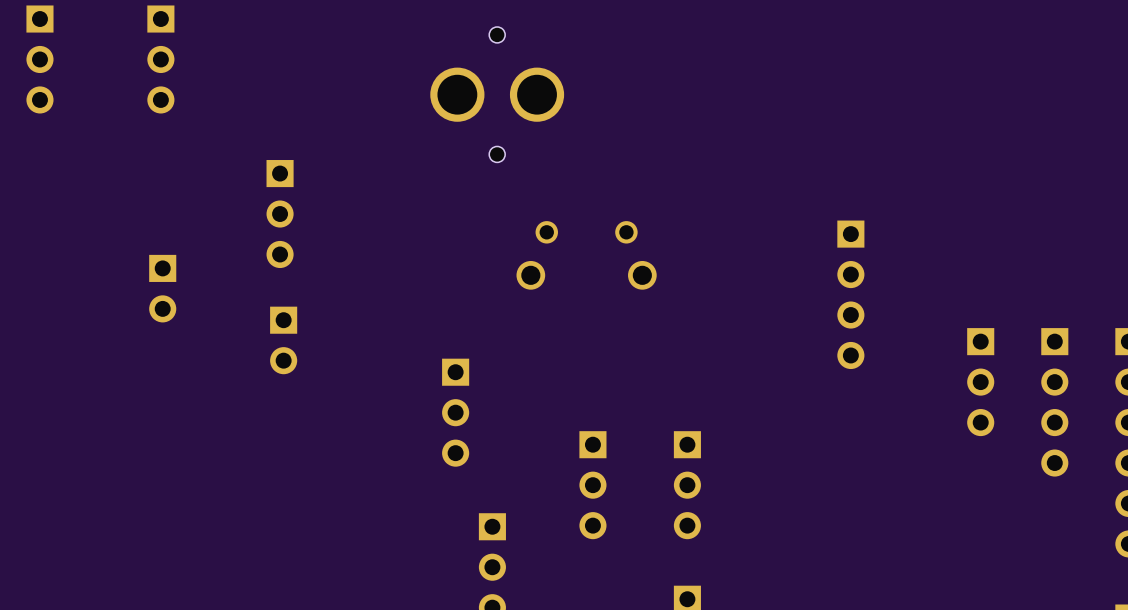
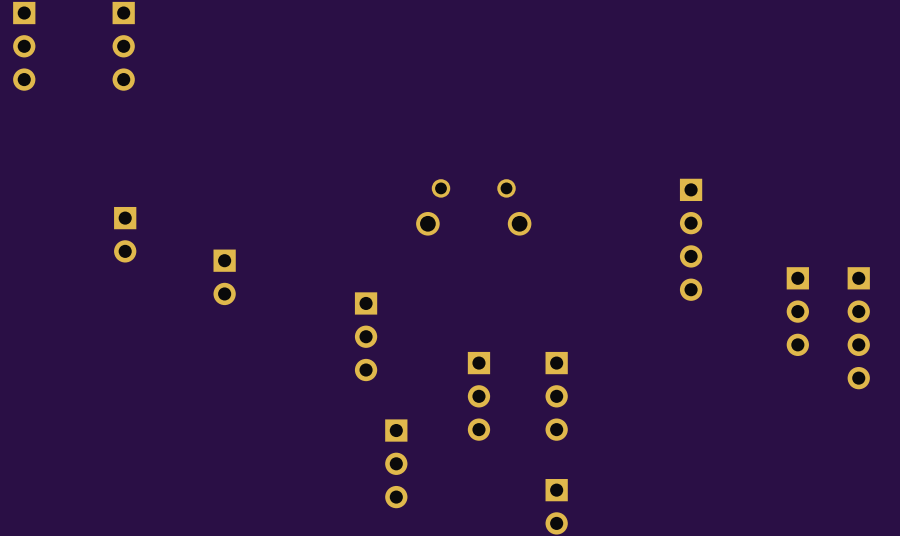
part: (497, 94) -> none
part: (280, 214) -> none

